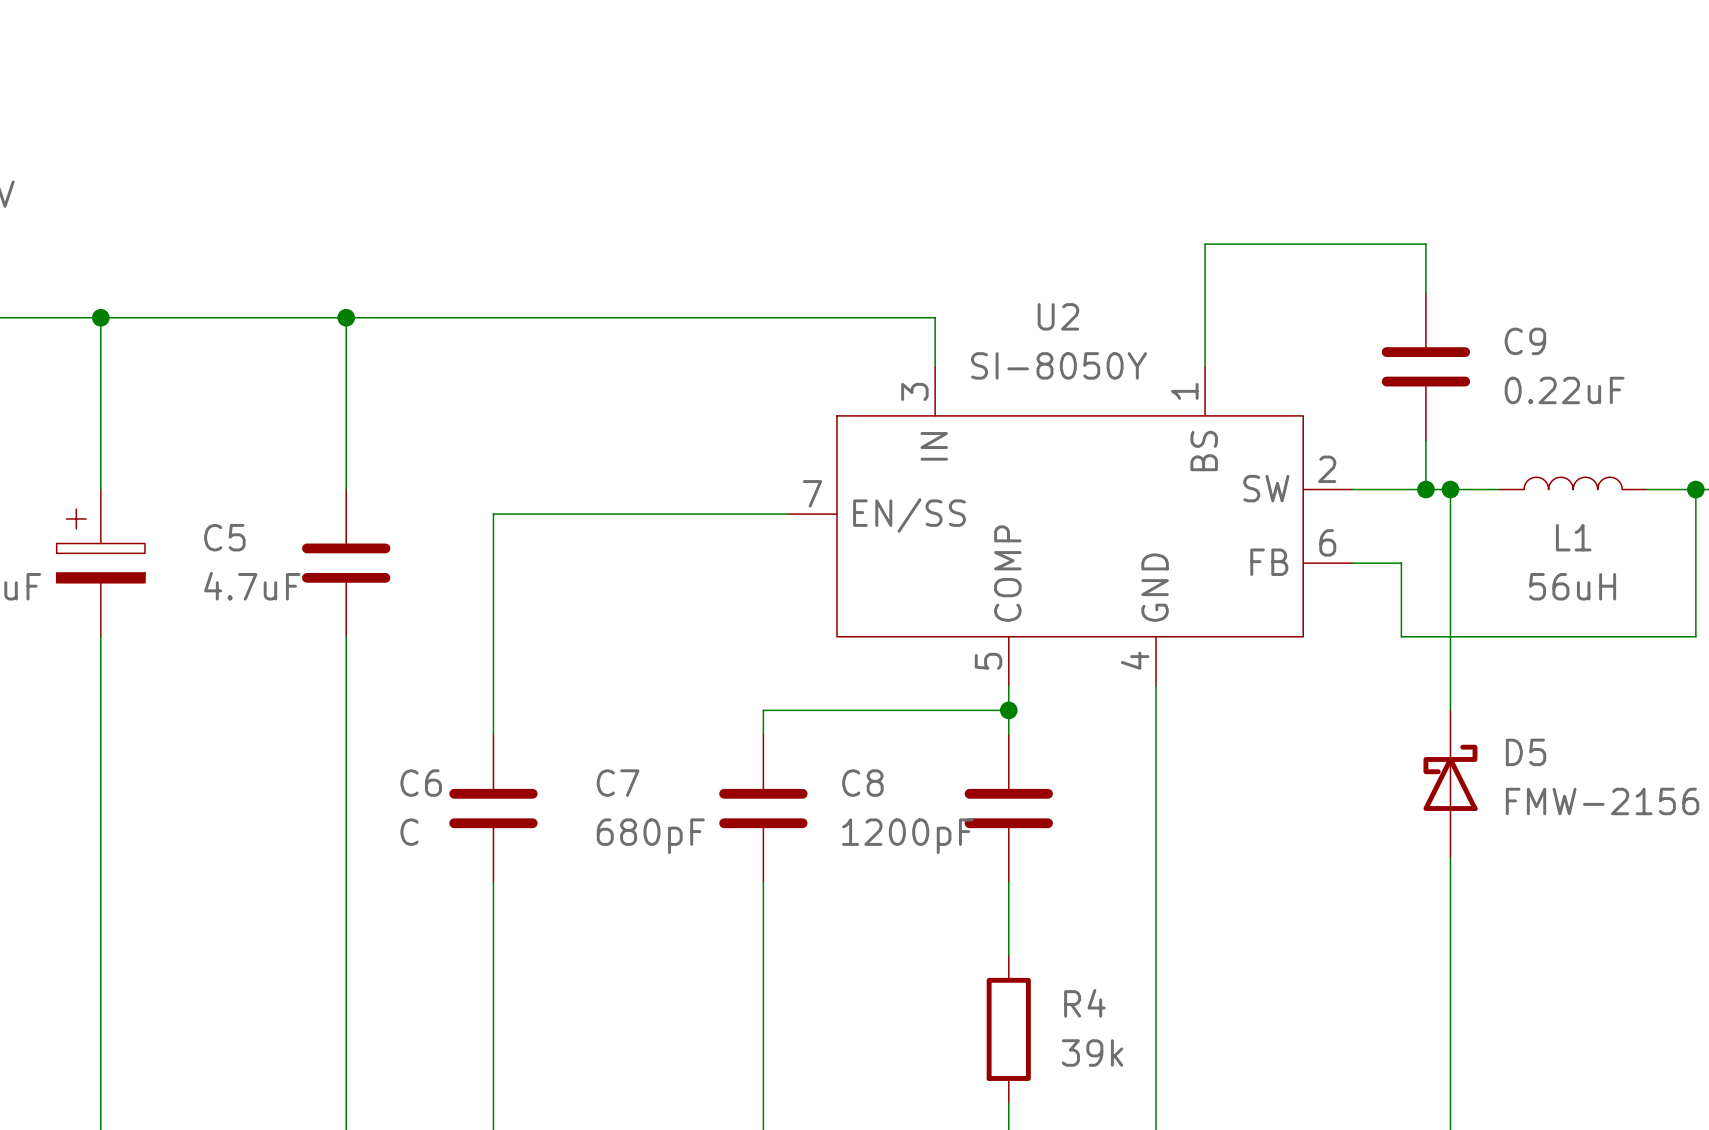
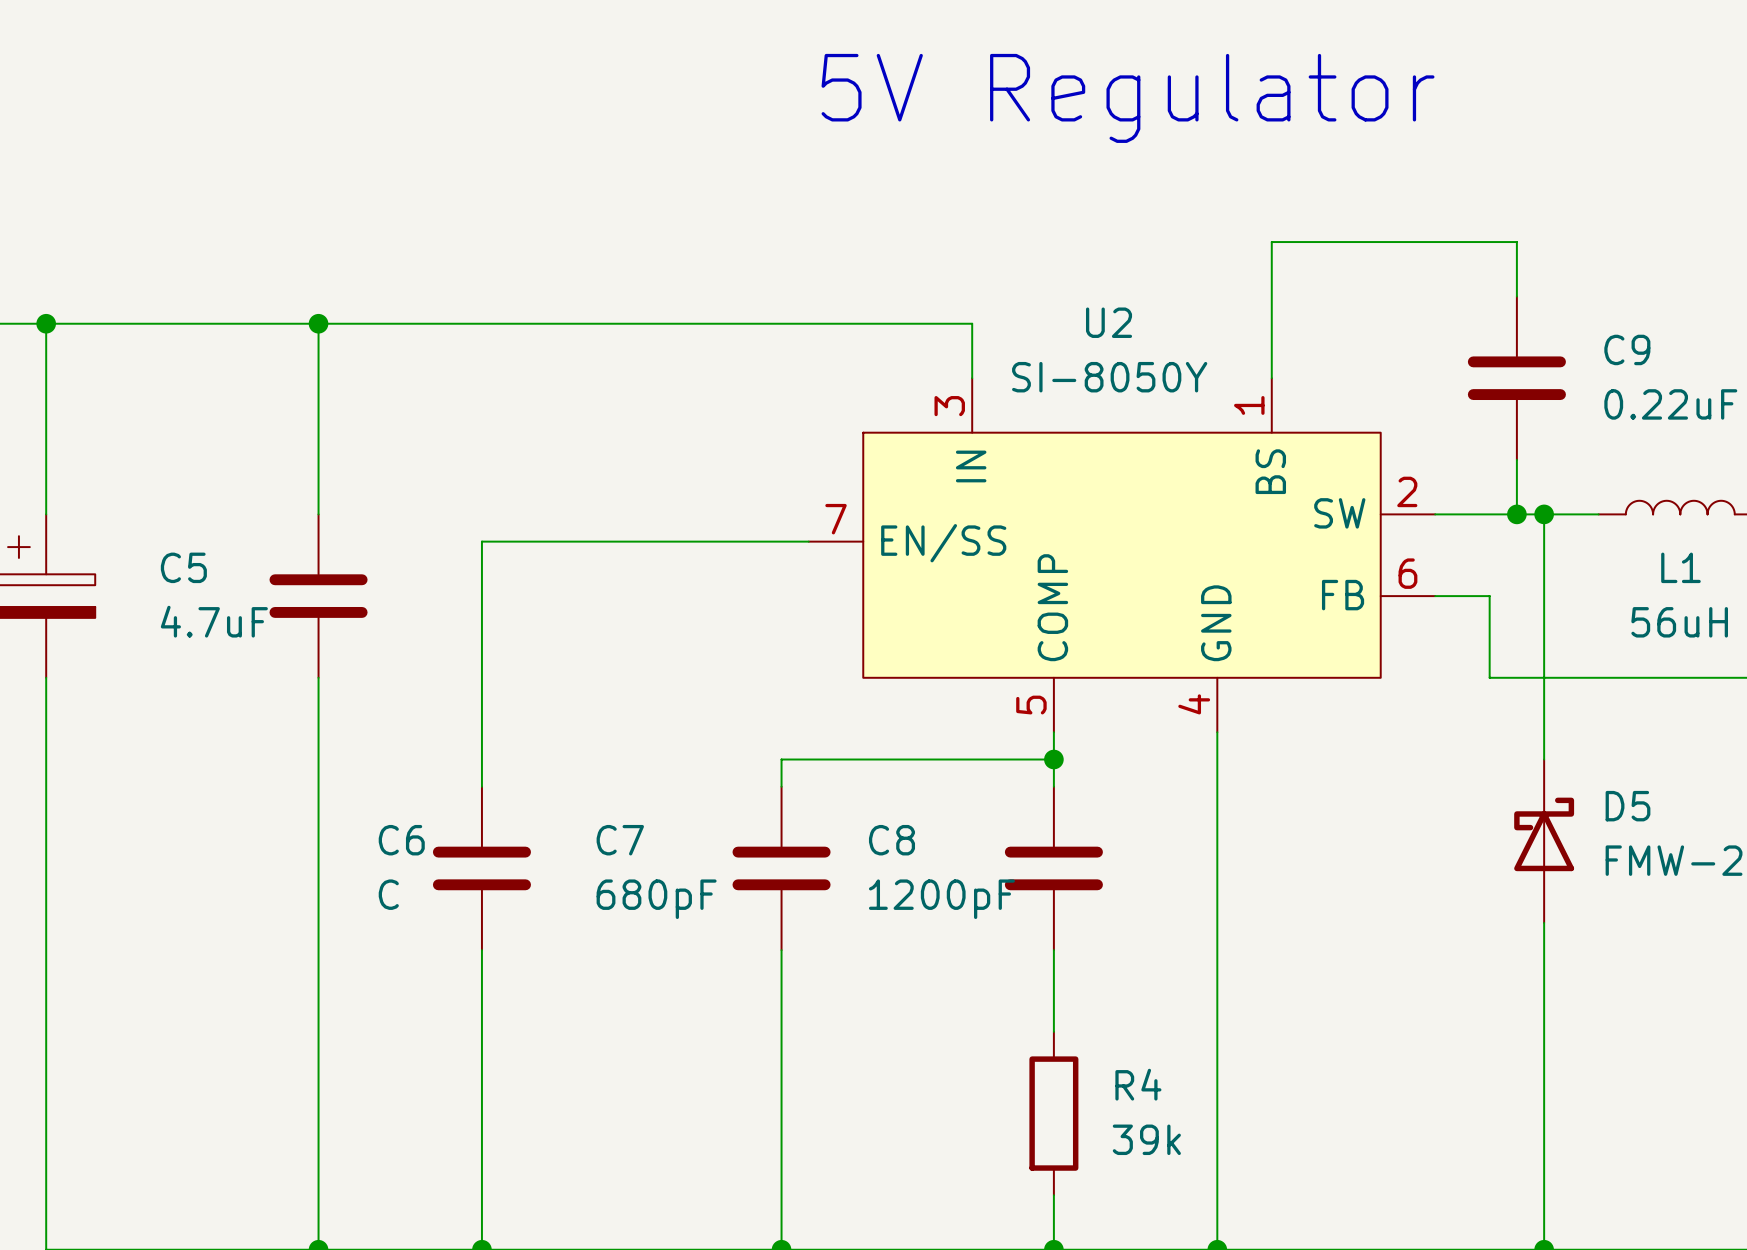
text: none -> 5V Regulator (1128, 98)

